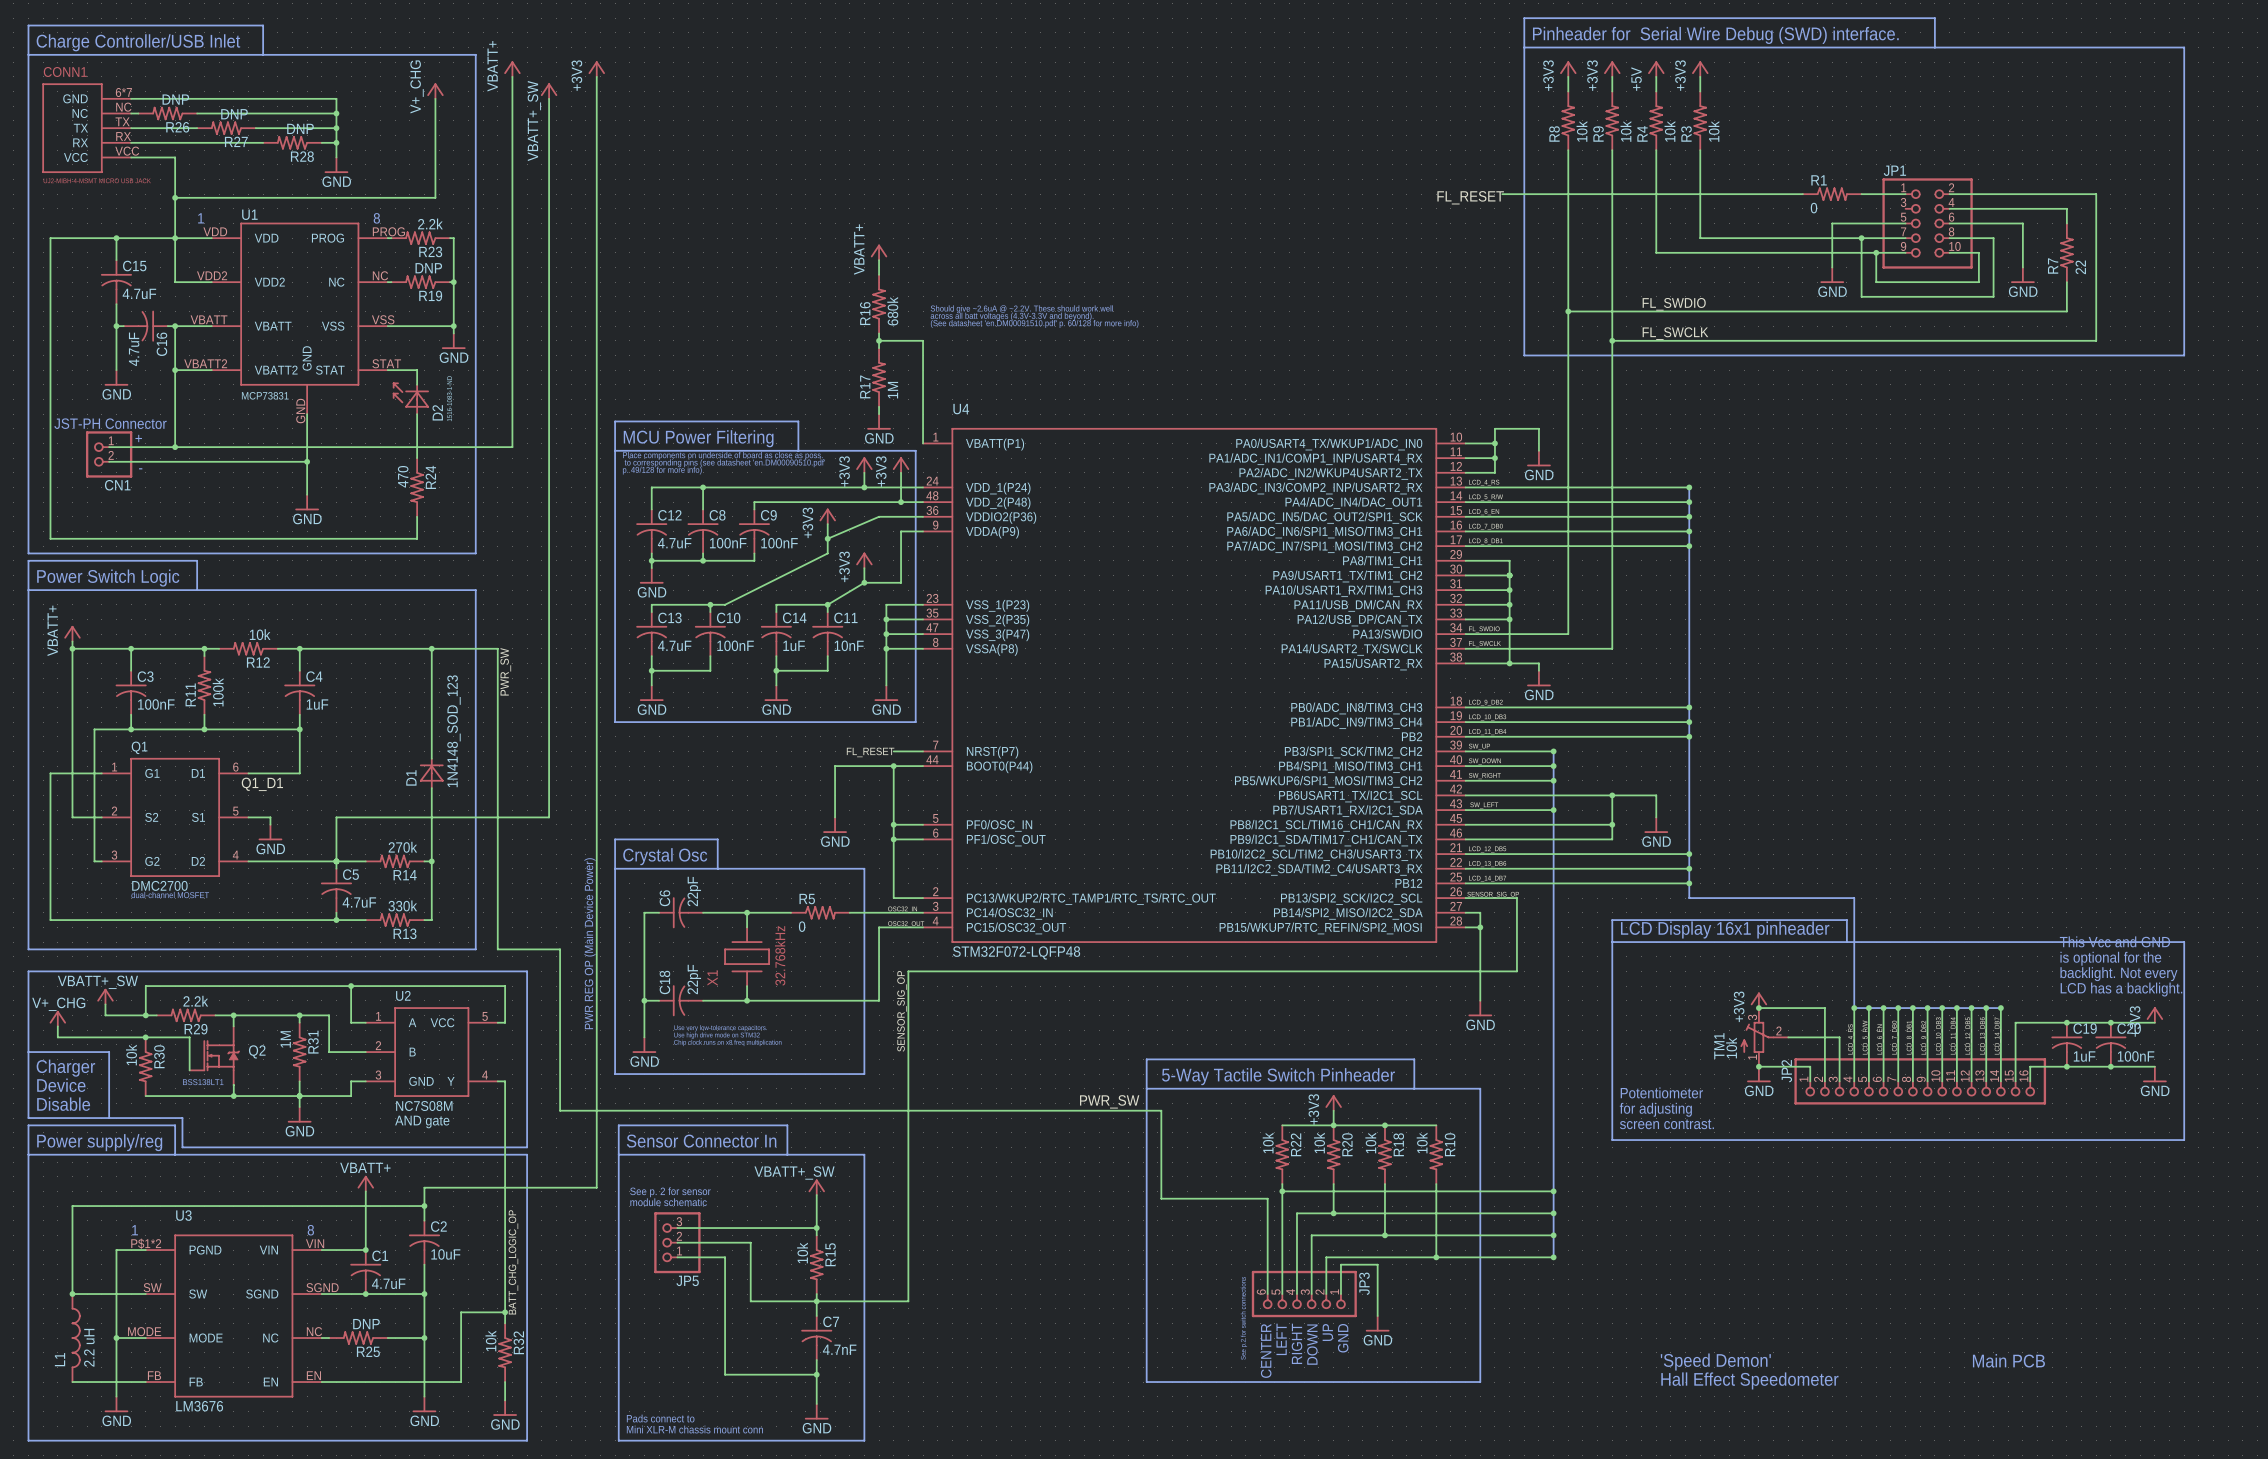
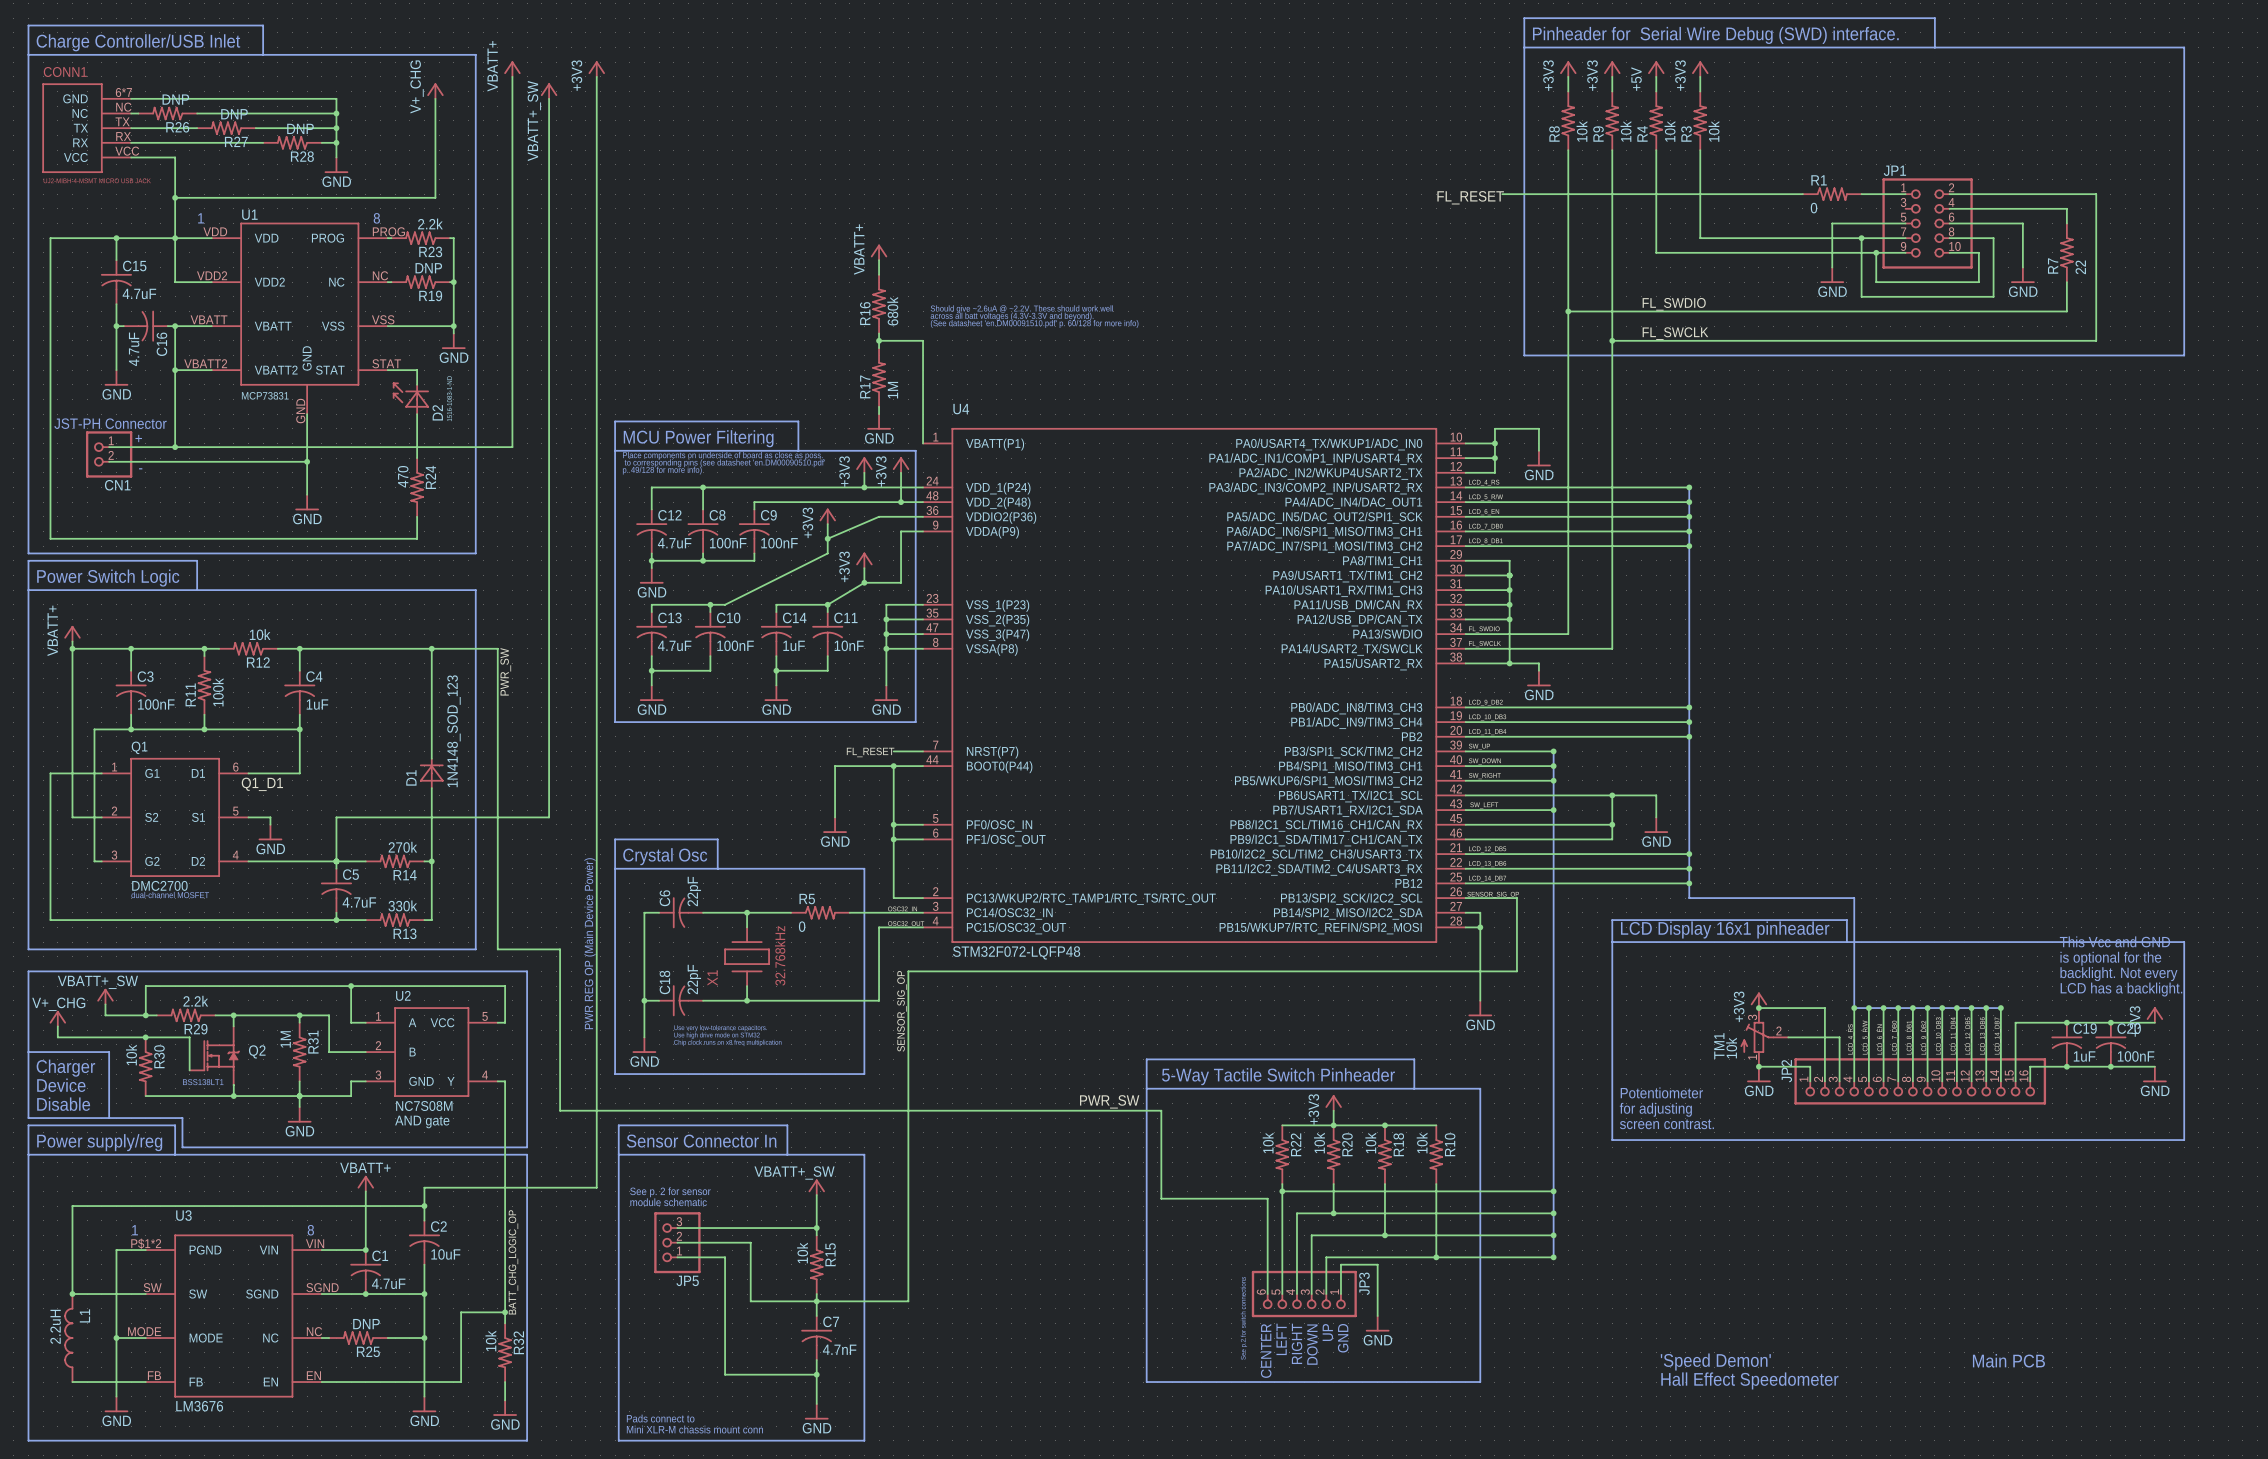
L1 rotation: 0° (76, 1338) -> 180° (68, 1338)
L1 value: 2.2 uH (89, 1347) -> 2.2uH (55, 1326)

